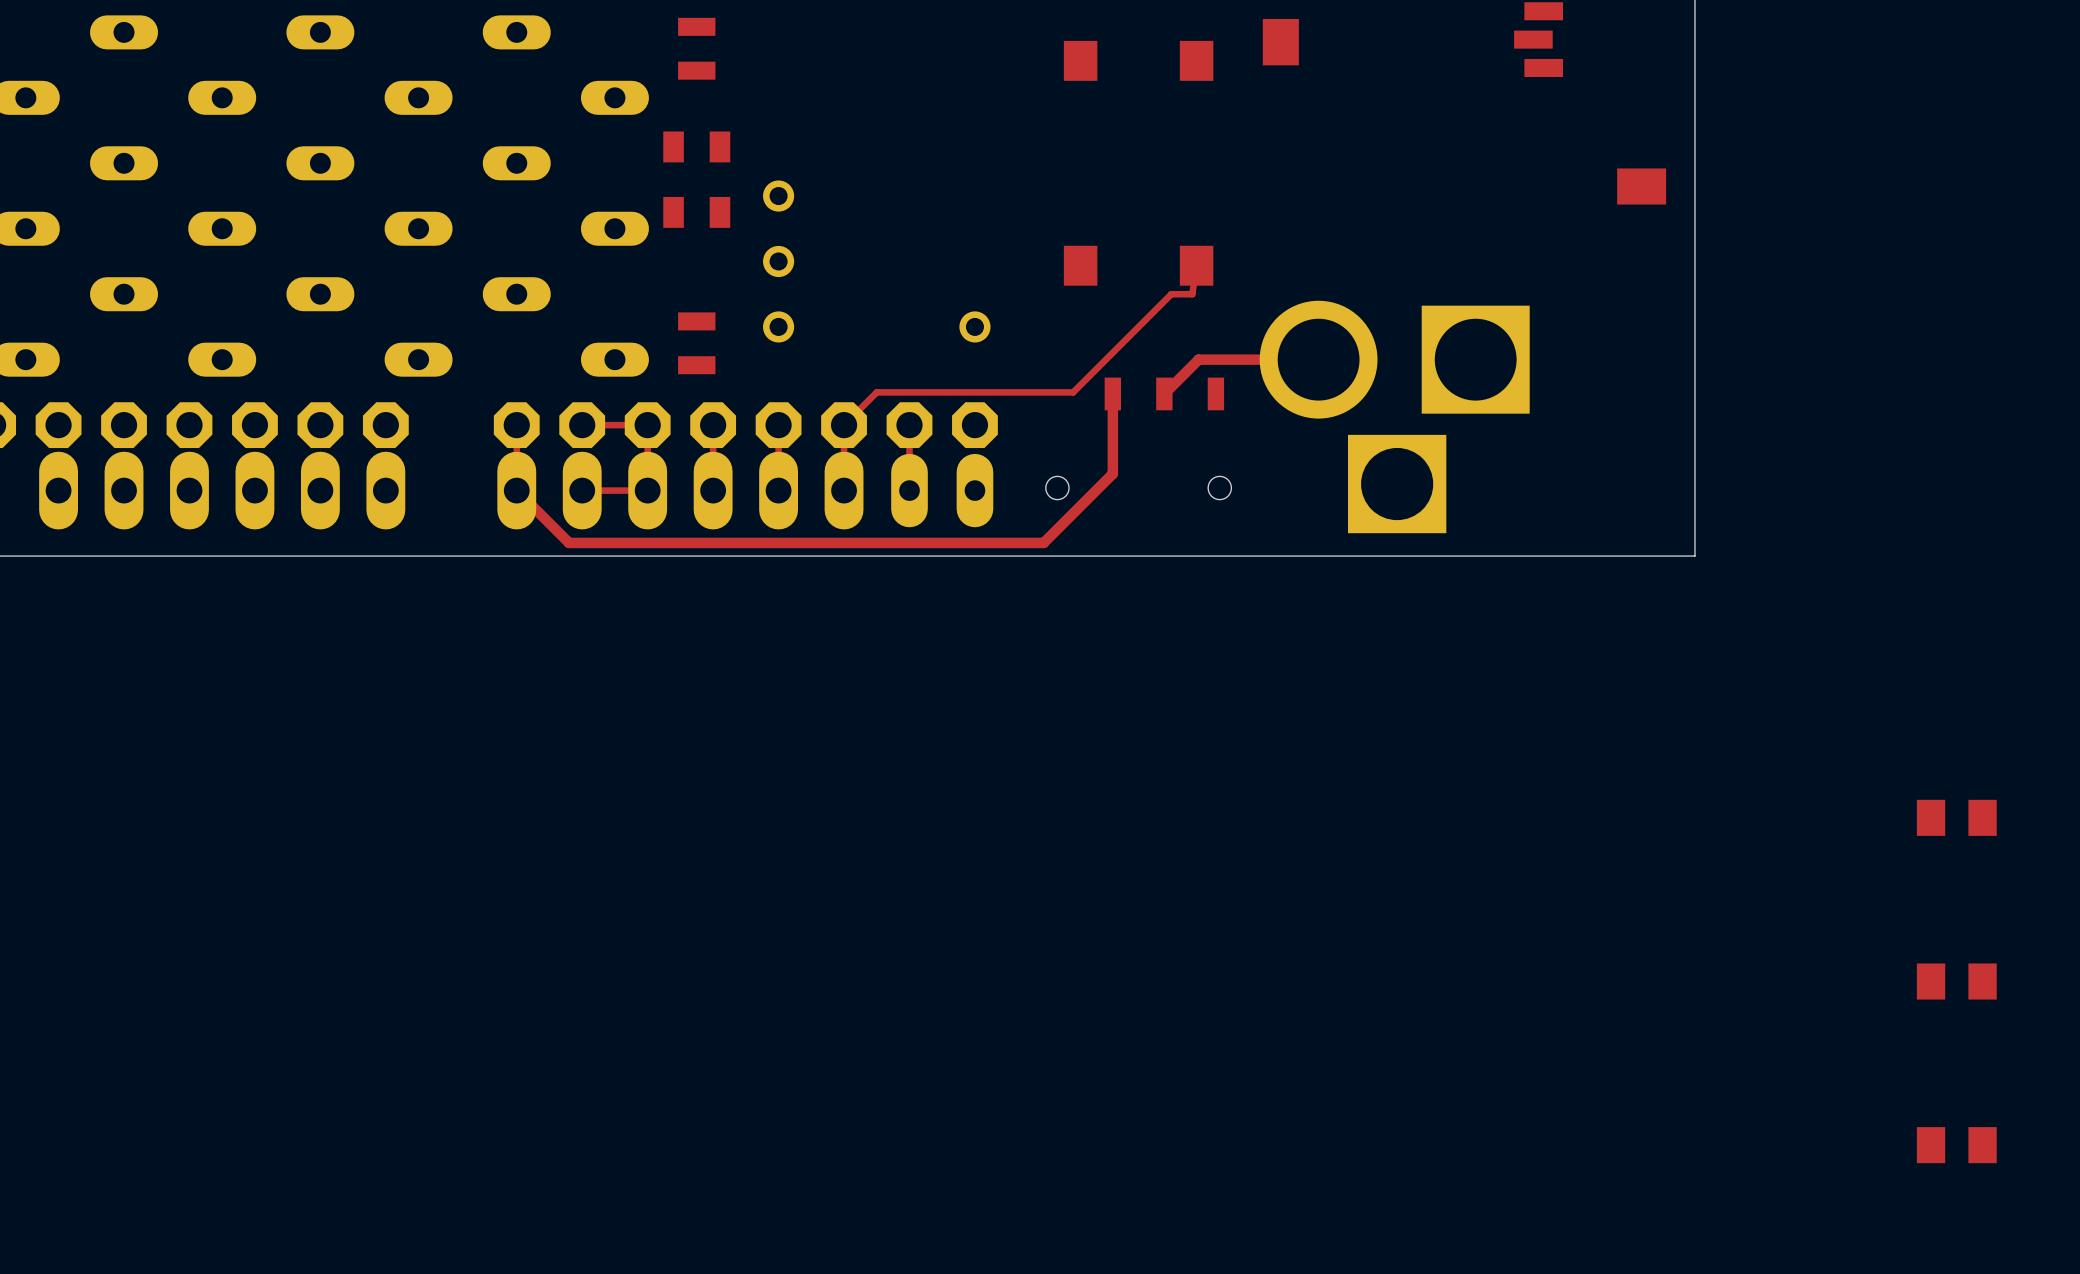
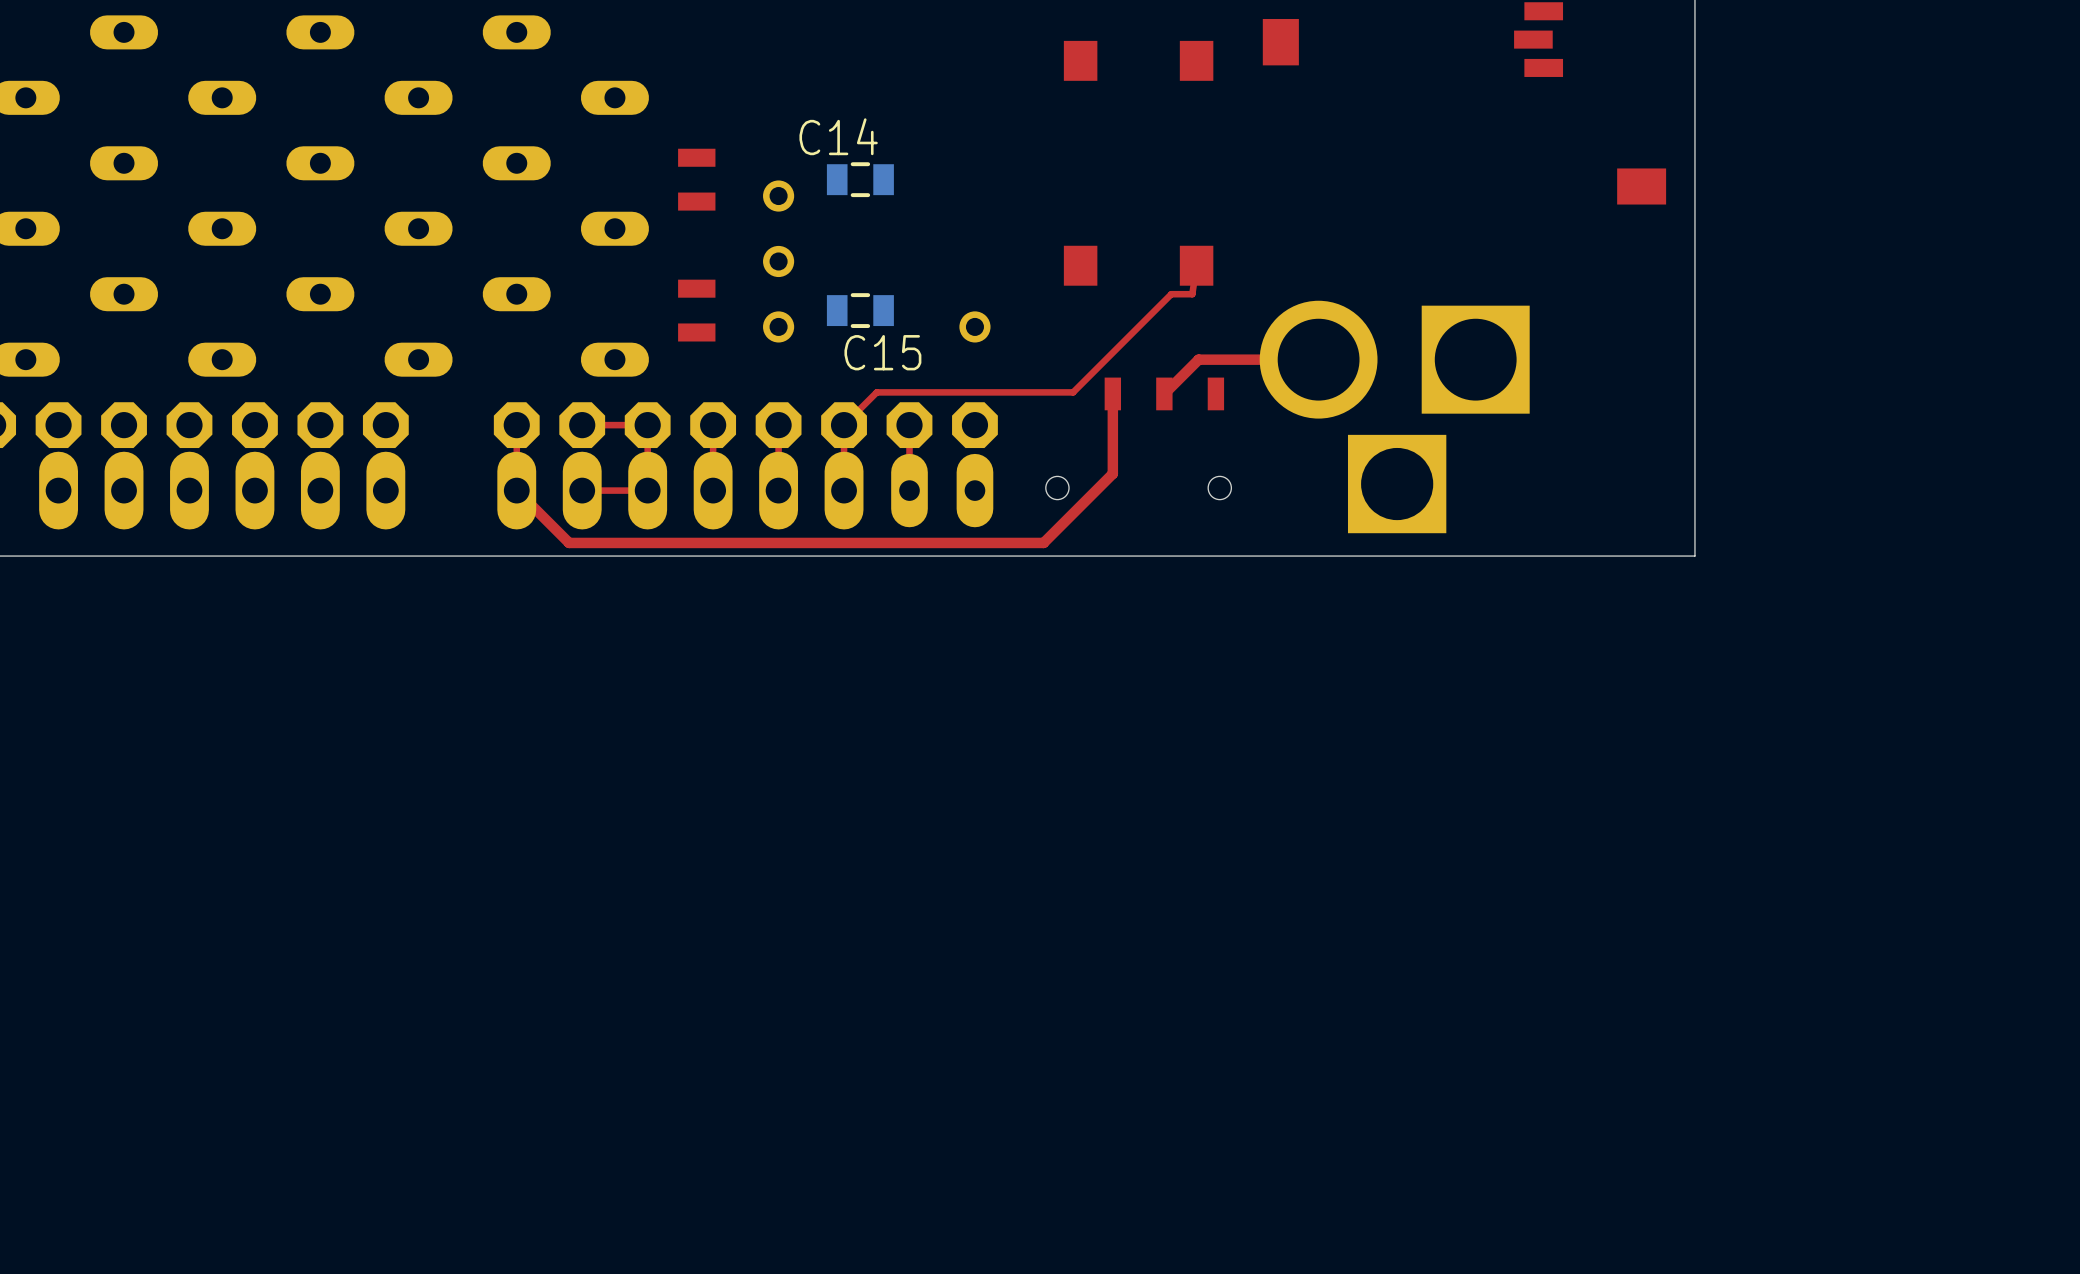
part: (696, 48) -> none
C14 side: top (696, 146) -> bottom (860, 179)
part: none -> (696, 179)
C15 side: top (696, 212) -> bottom (860, 310)
part position: (696, 343) -> (696, 310)
part: (1956, 817) -> none
part: (1956, 981) -> none
part: (1956, 1145) -> none

